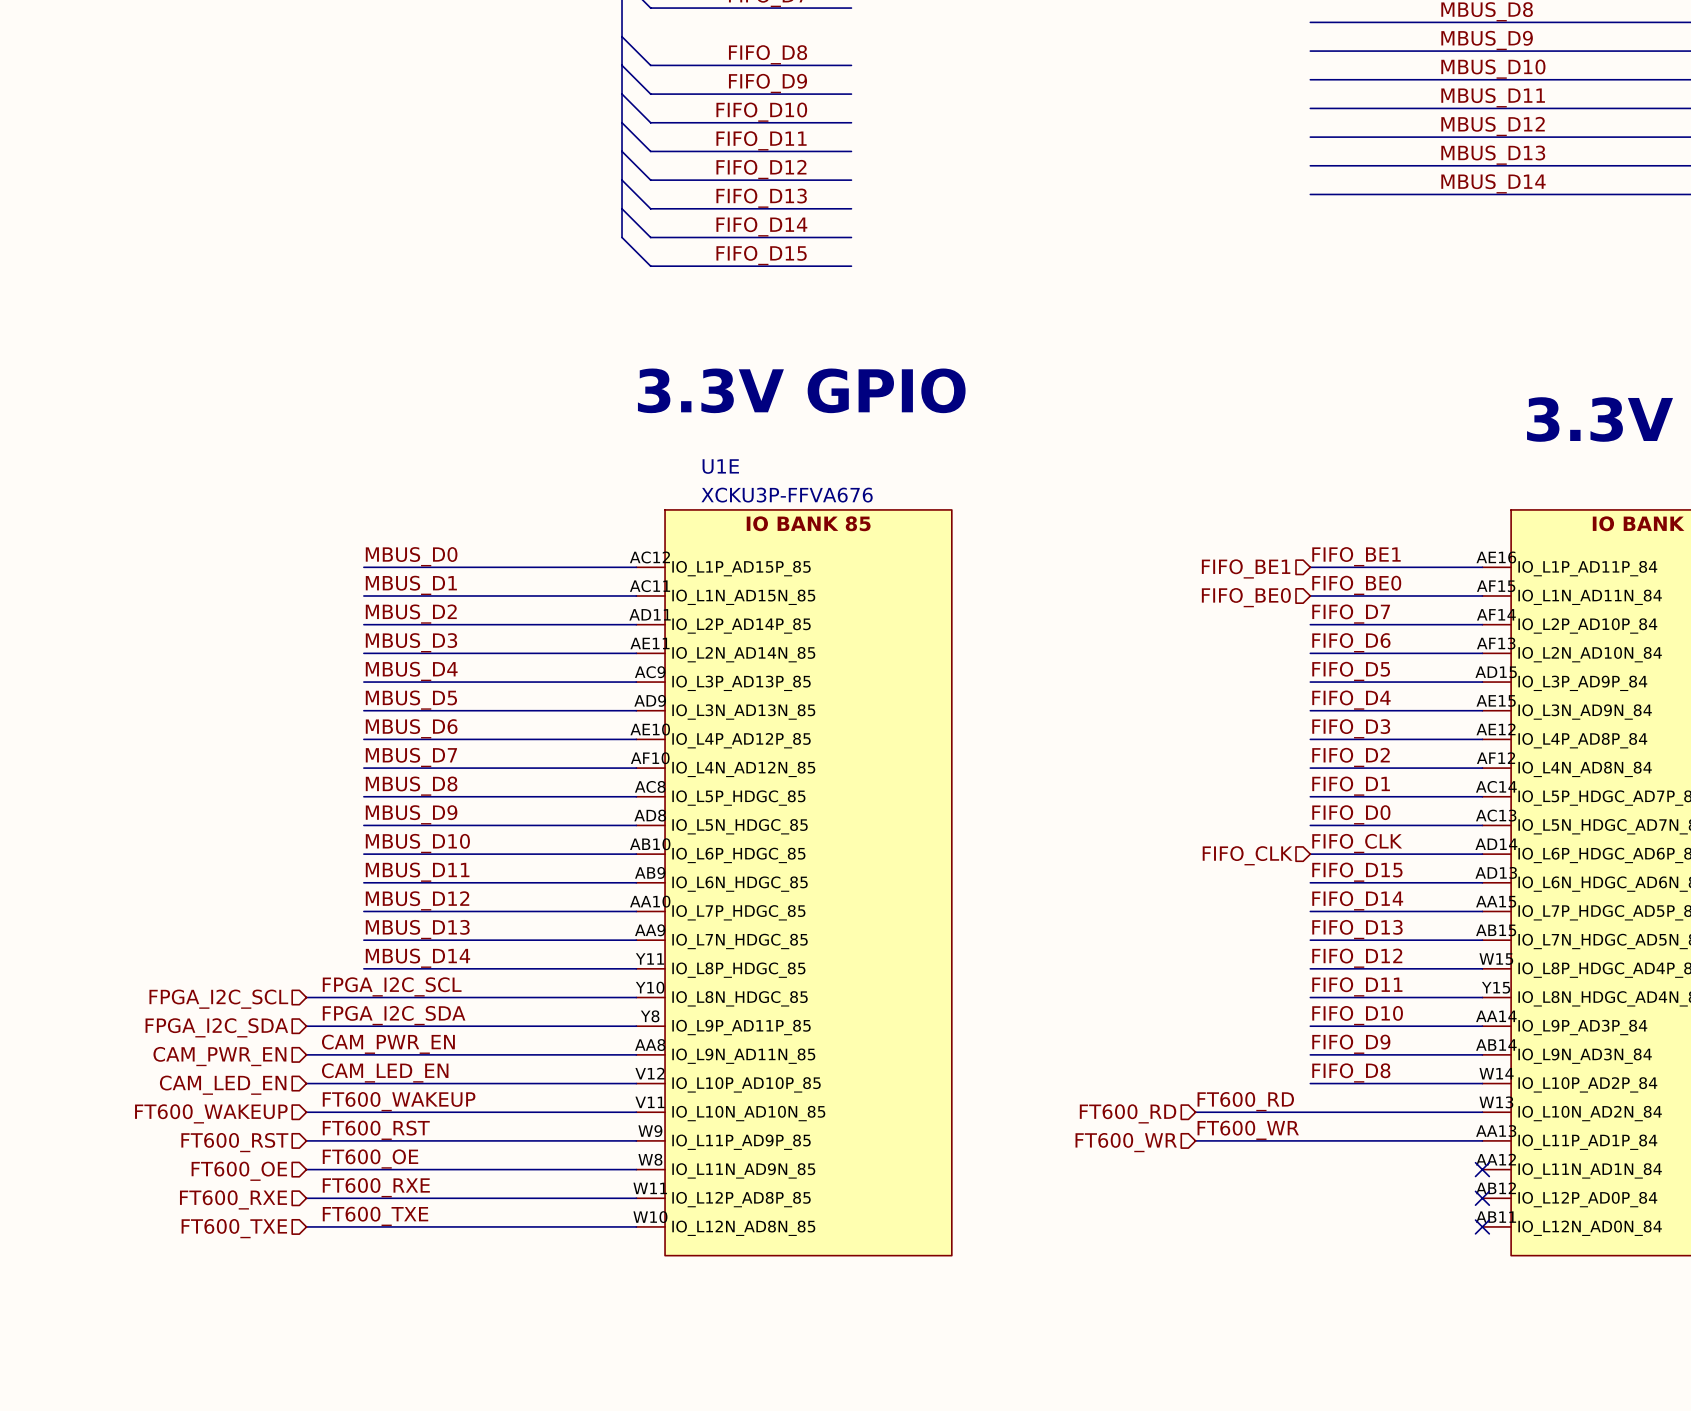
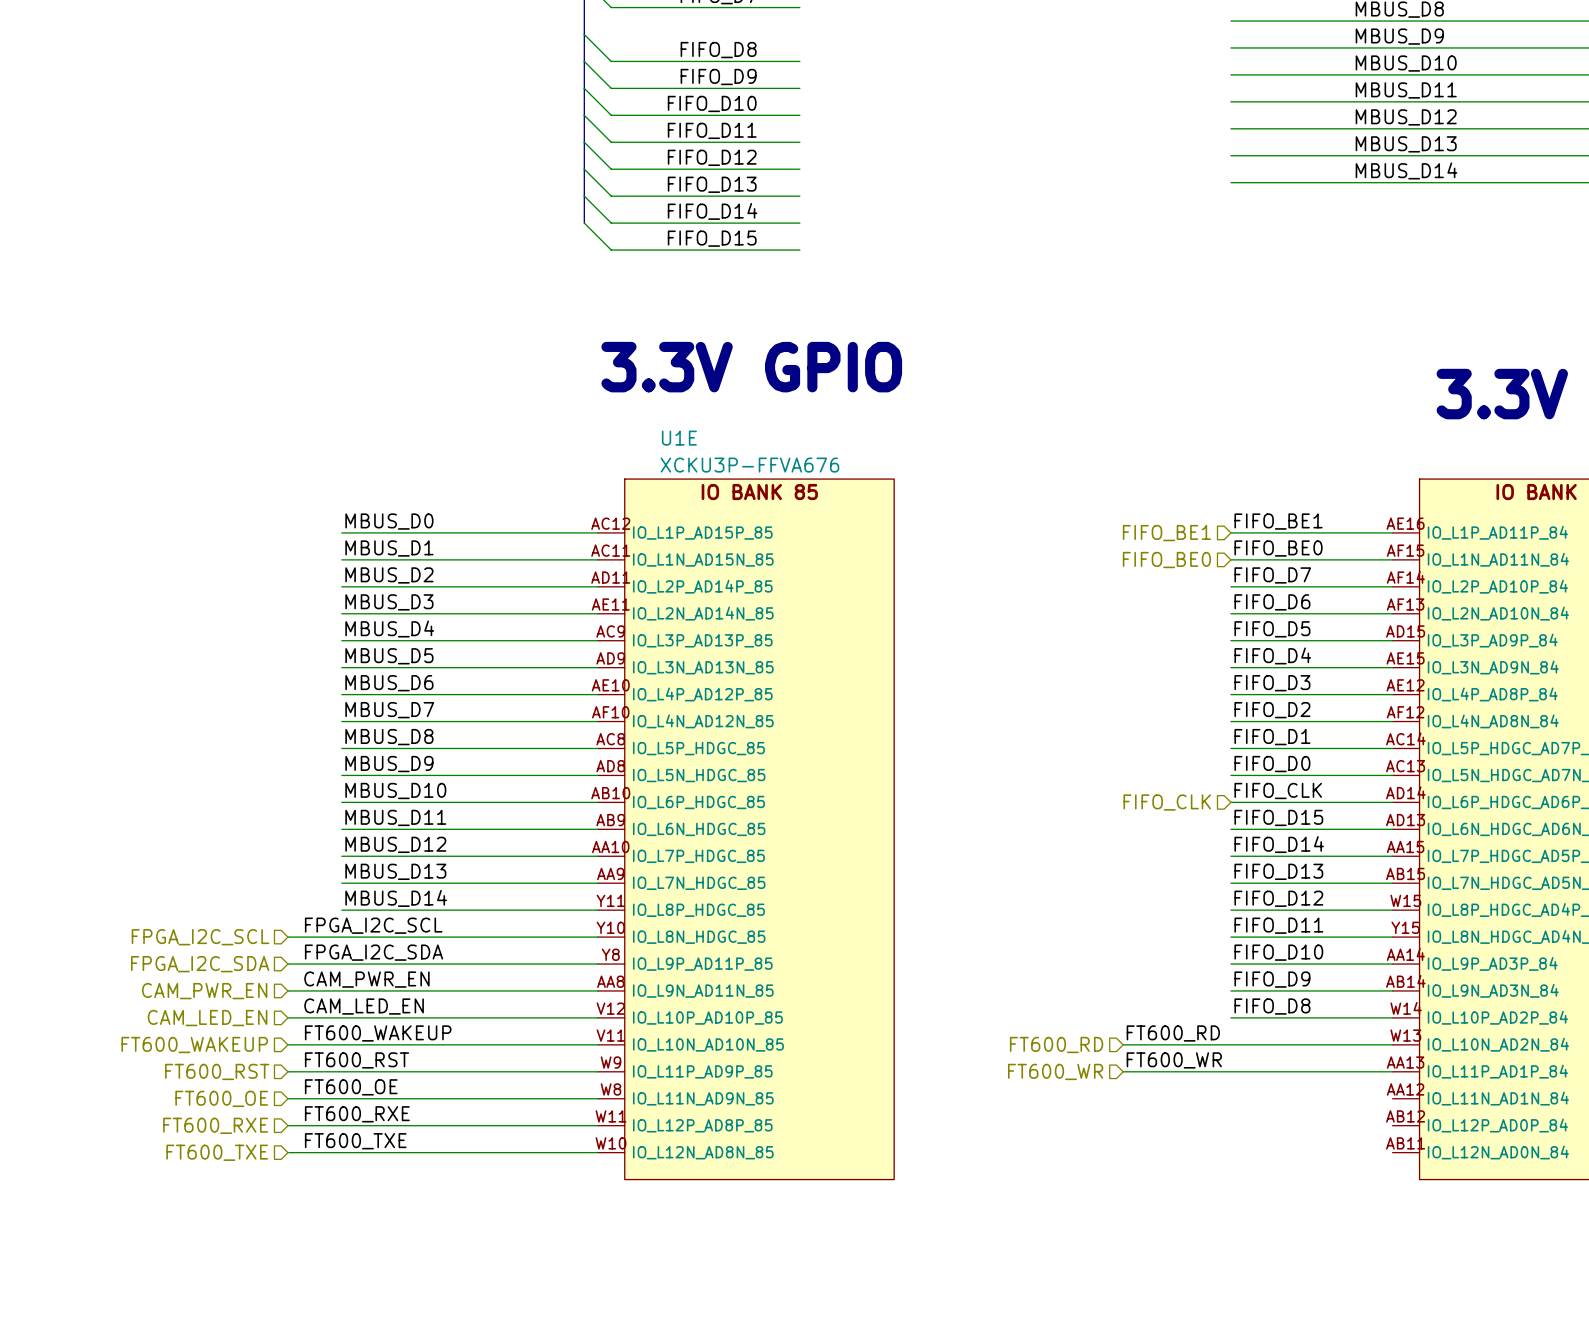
no-connect mark: (1482, 1169) -> none
no-connect mark: (1482, 1198) -> none
no-connect mark: (1482, 1226) -> none

